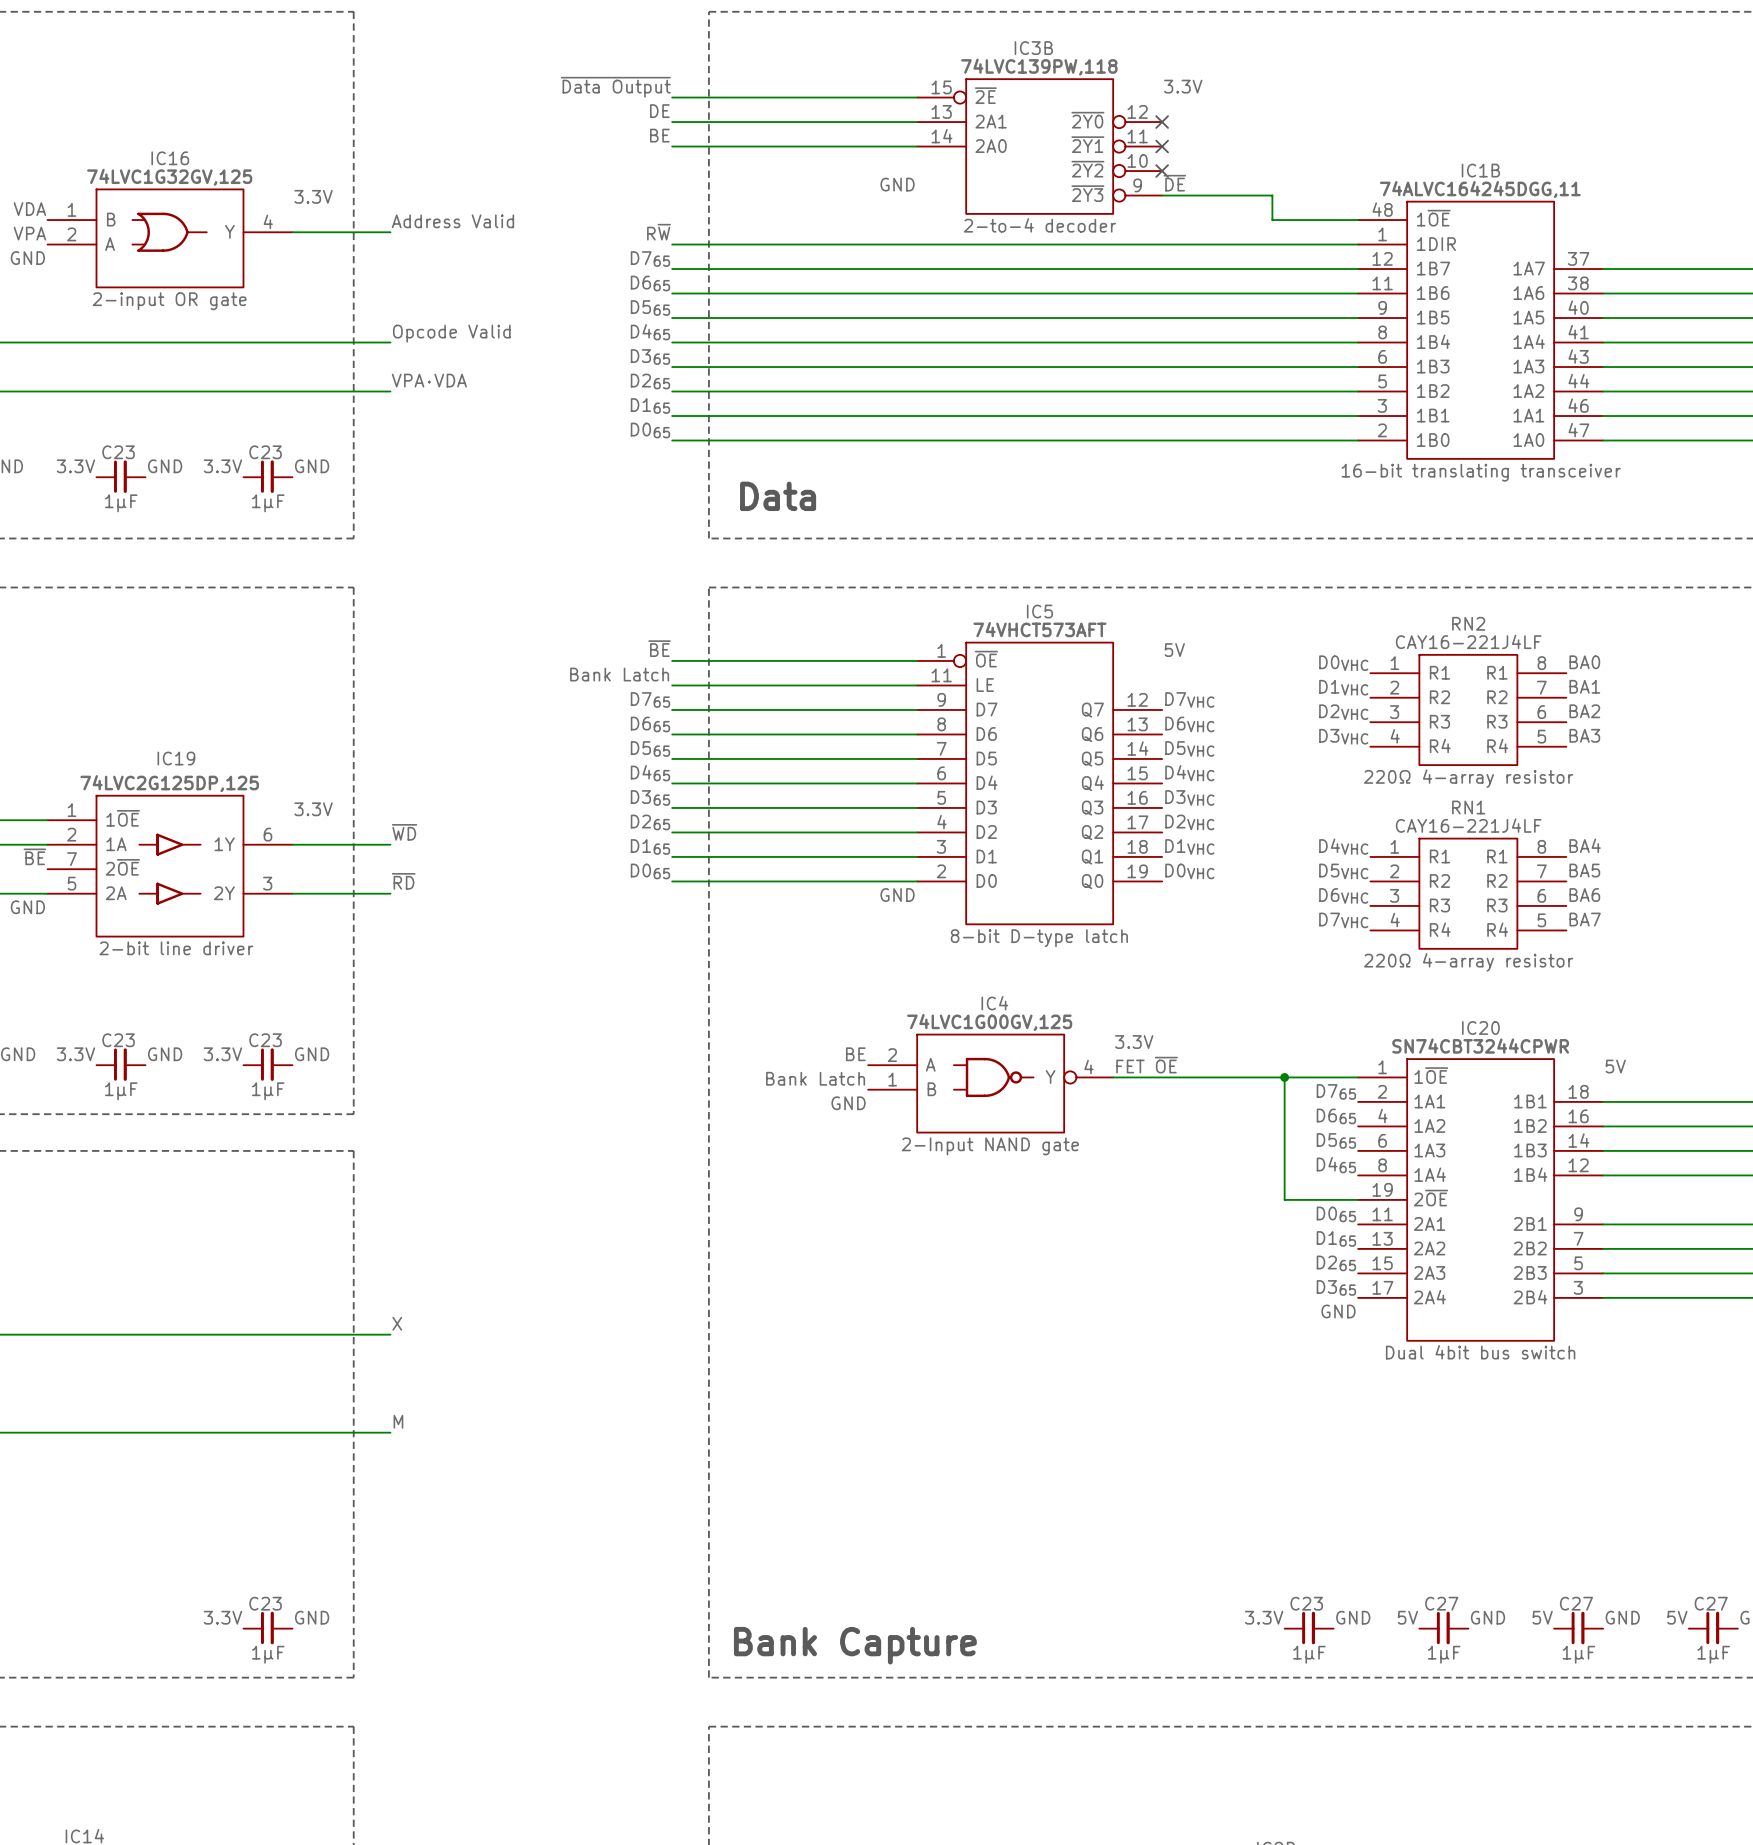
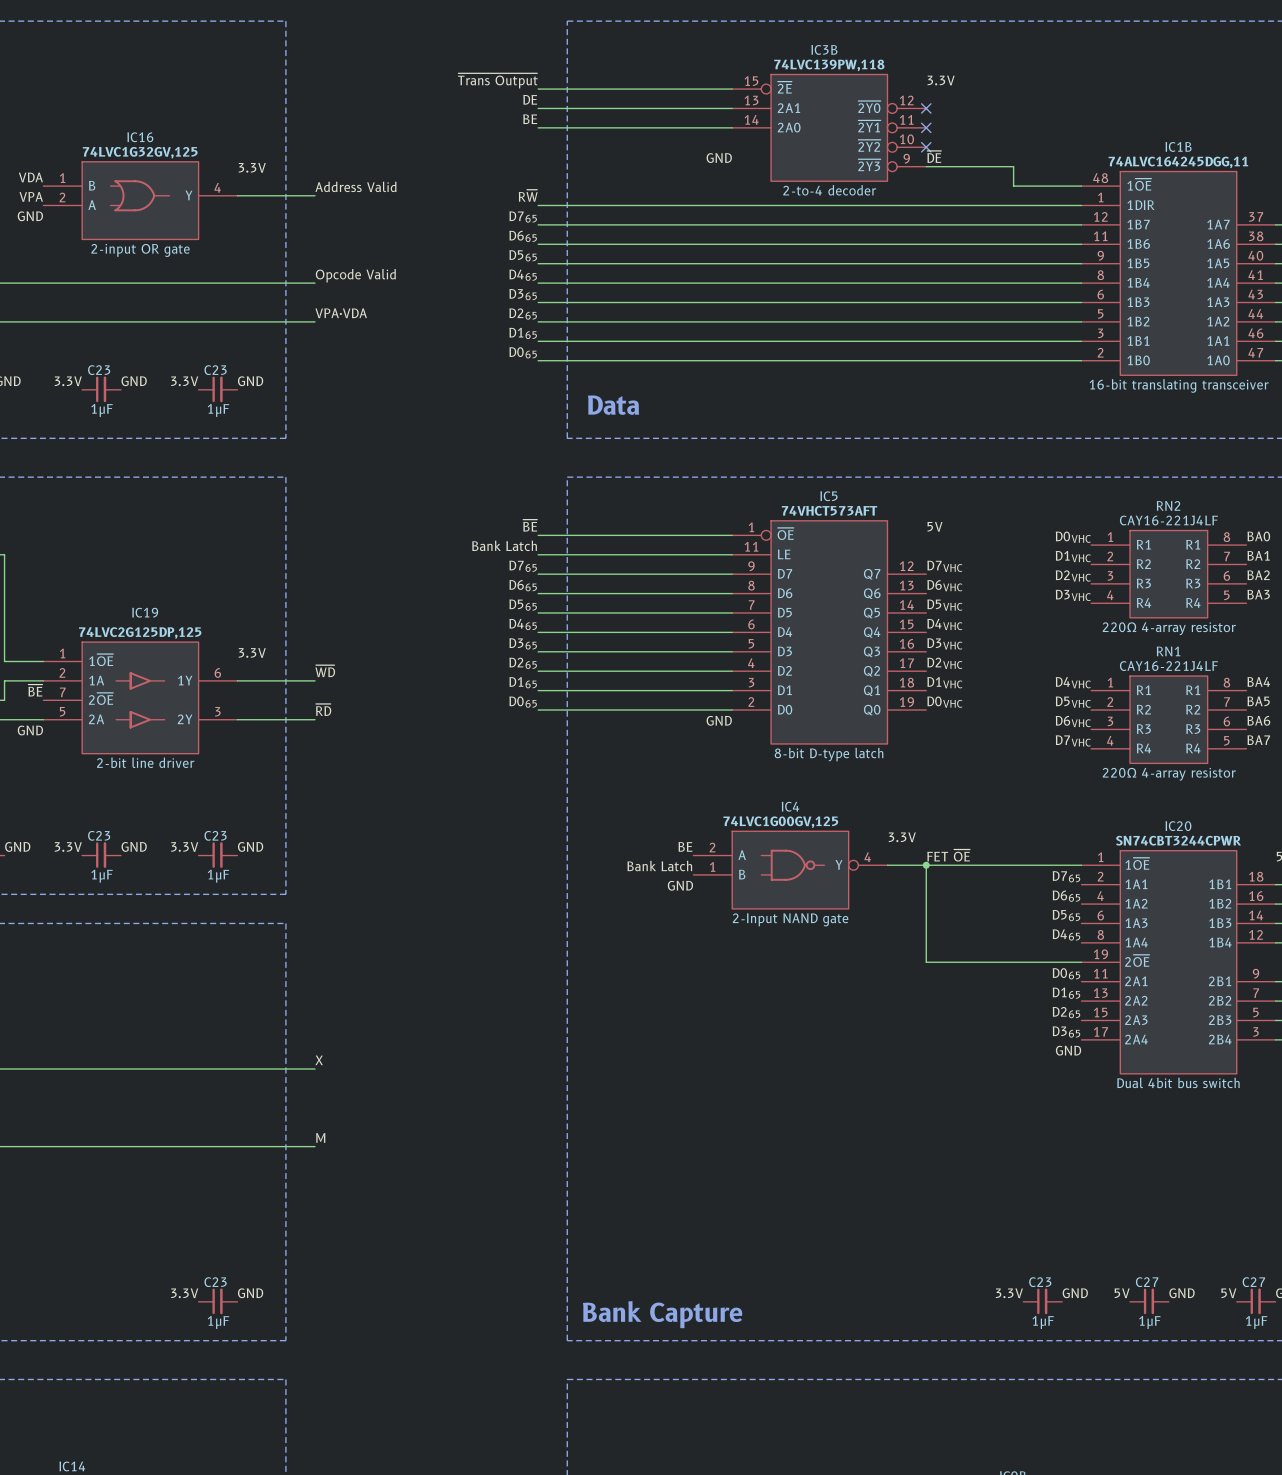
label: ~{Data Output} (615, 87) -> ~{Trans Output} (497, 80)
label position: FET ~{OE} (1147, 1065) -> FET ~{OE} (948, 855)
junction: none -> (926, 865)
wire: (1284, 1077) (1284, 1199) -> (926, 865) (926, 962) (1023, 962)
junction: (1284, 1077) -> none

